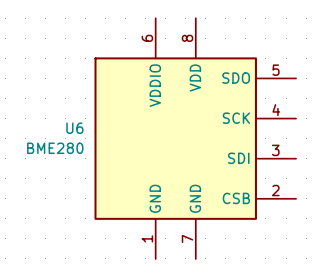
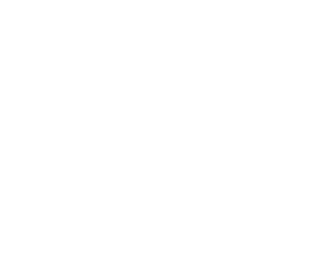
U6: BME280 (195, 138) -> none

